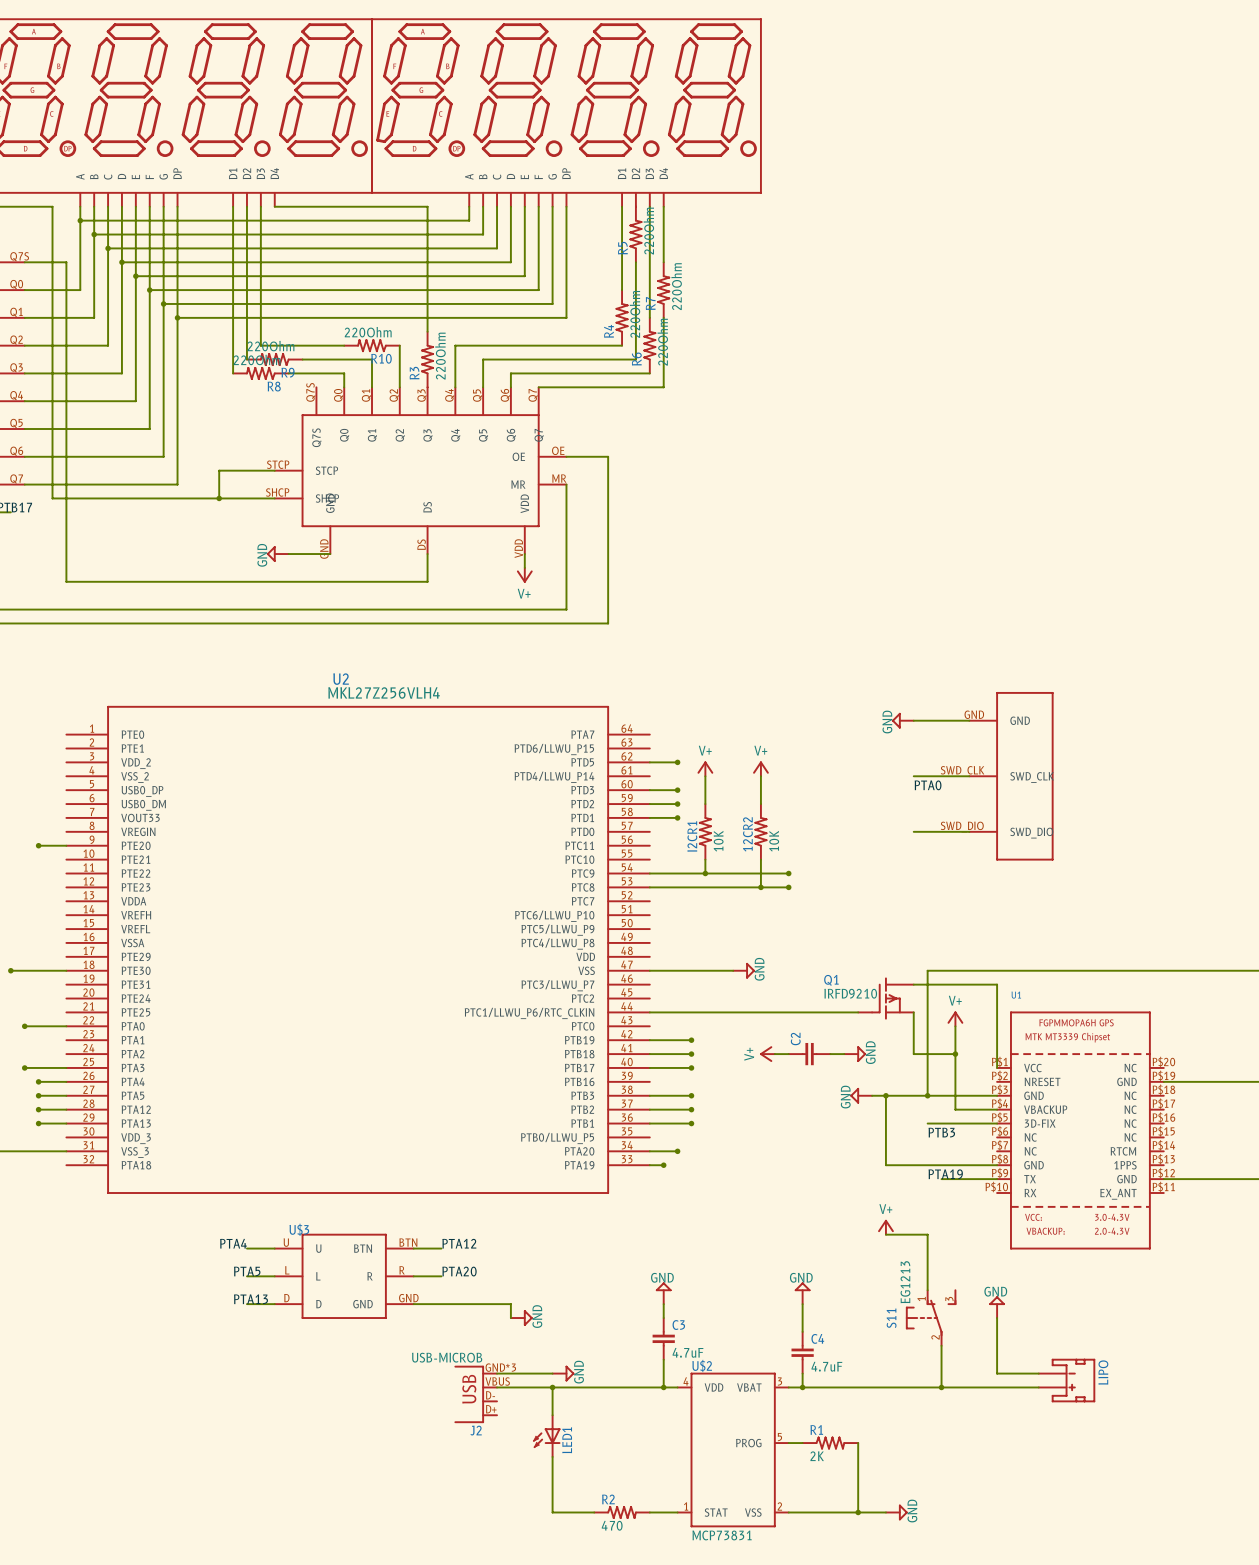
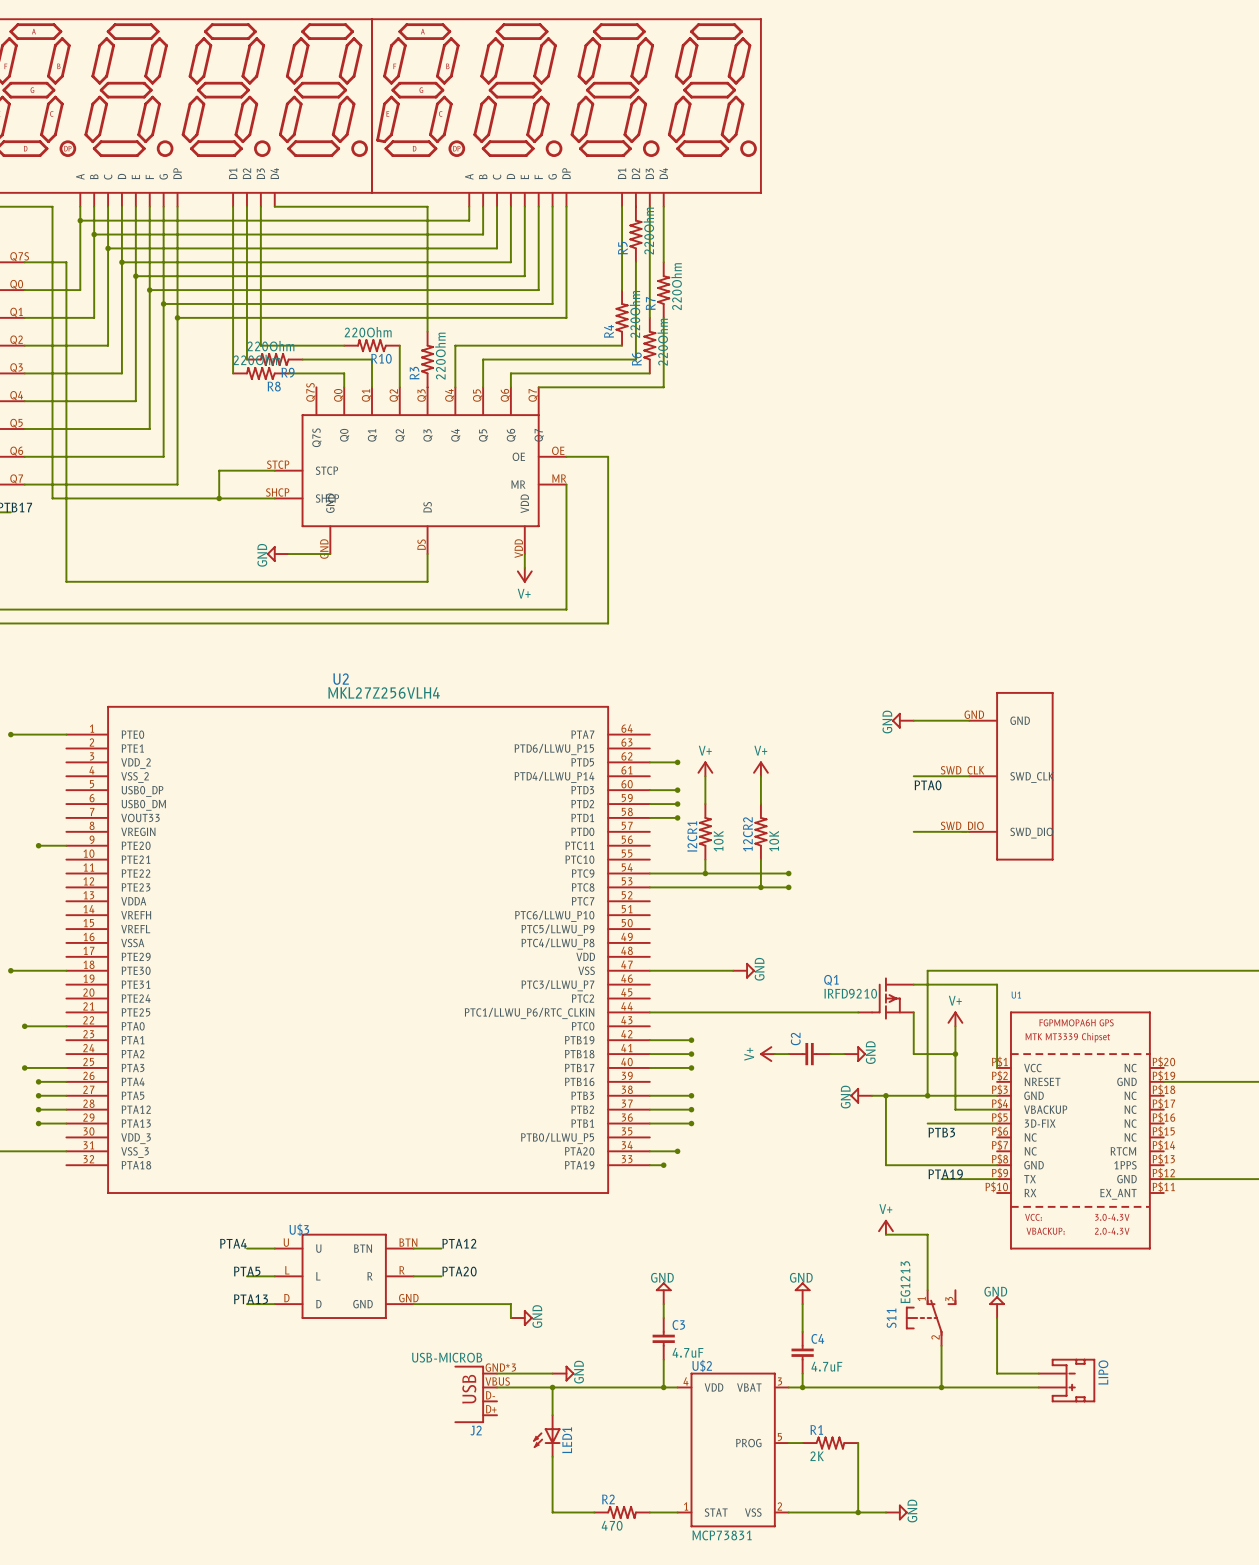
wire: none -> (10, 734) (66, 734)
junction: none -> (10, 734)

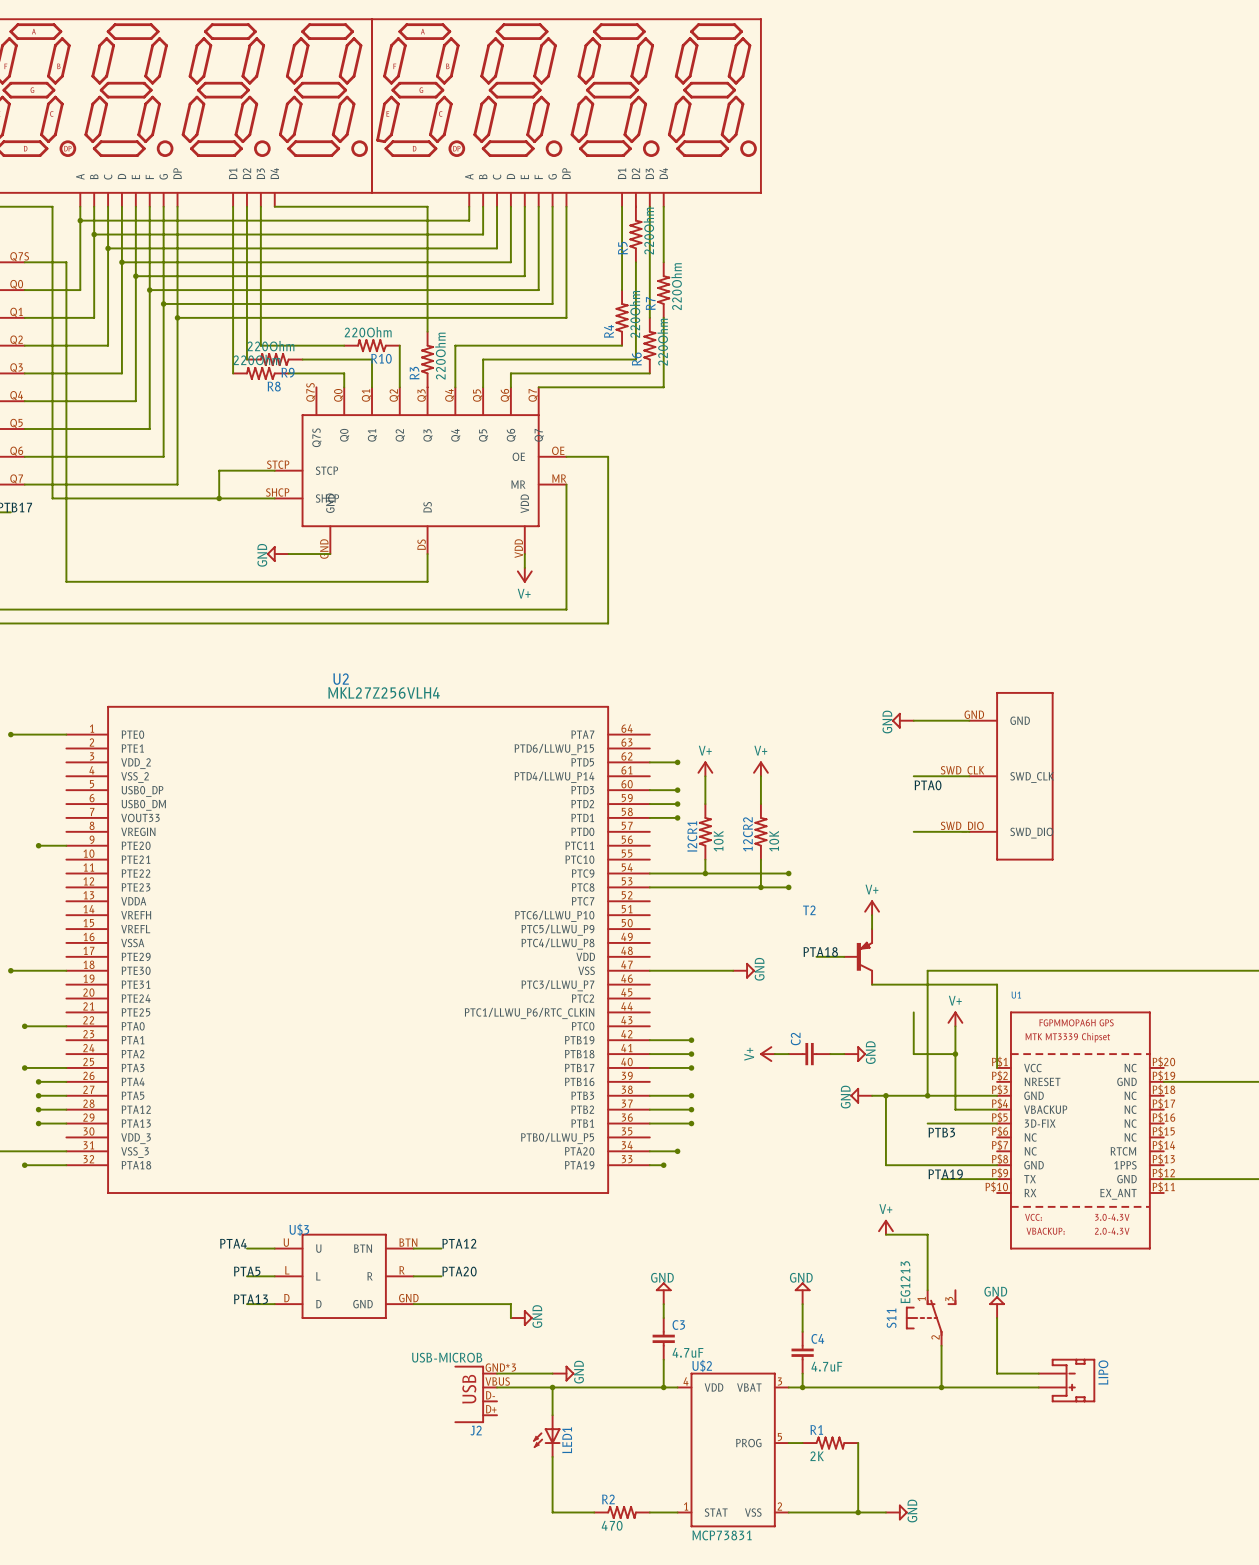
power symbol: none -> V+ (872, 907)
wire: none -> (872, 915) (872, 929)
label: none -> PTA18 (820, 952)
wire: none -> (816, 956) (844, 956)
T2: none -> (858, 956)
Q1: IRFD9210 (885, 998) -> none
wire: (649, 1012) (858, 1012) -> none
wire: none -> (24, 1165) (66, 1165)
junction: none -> (24, 1165)

